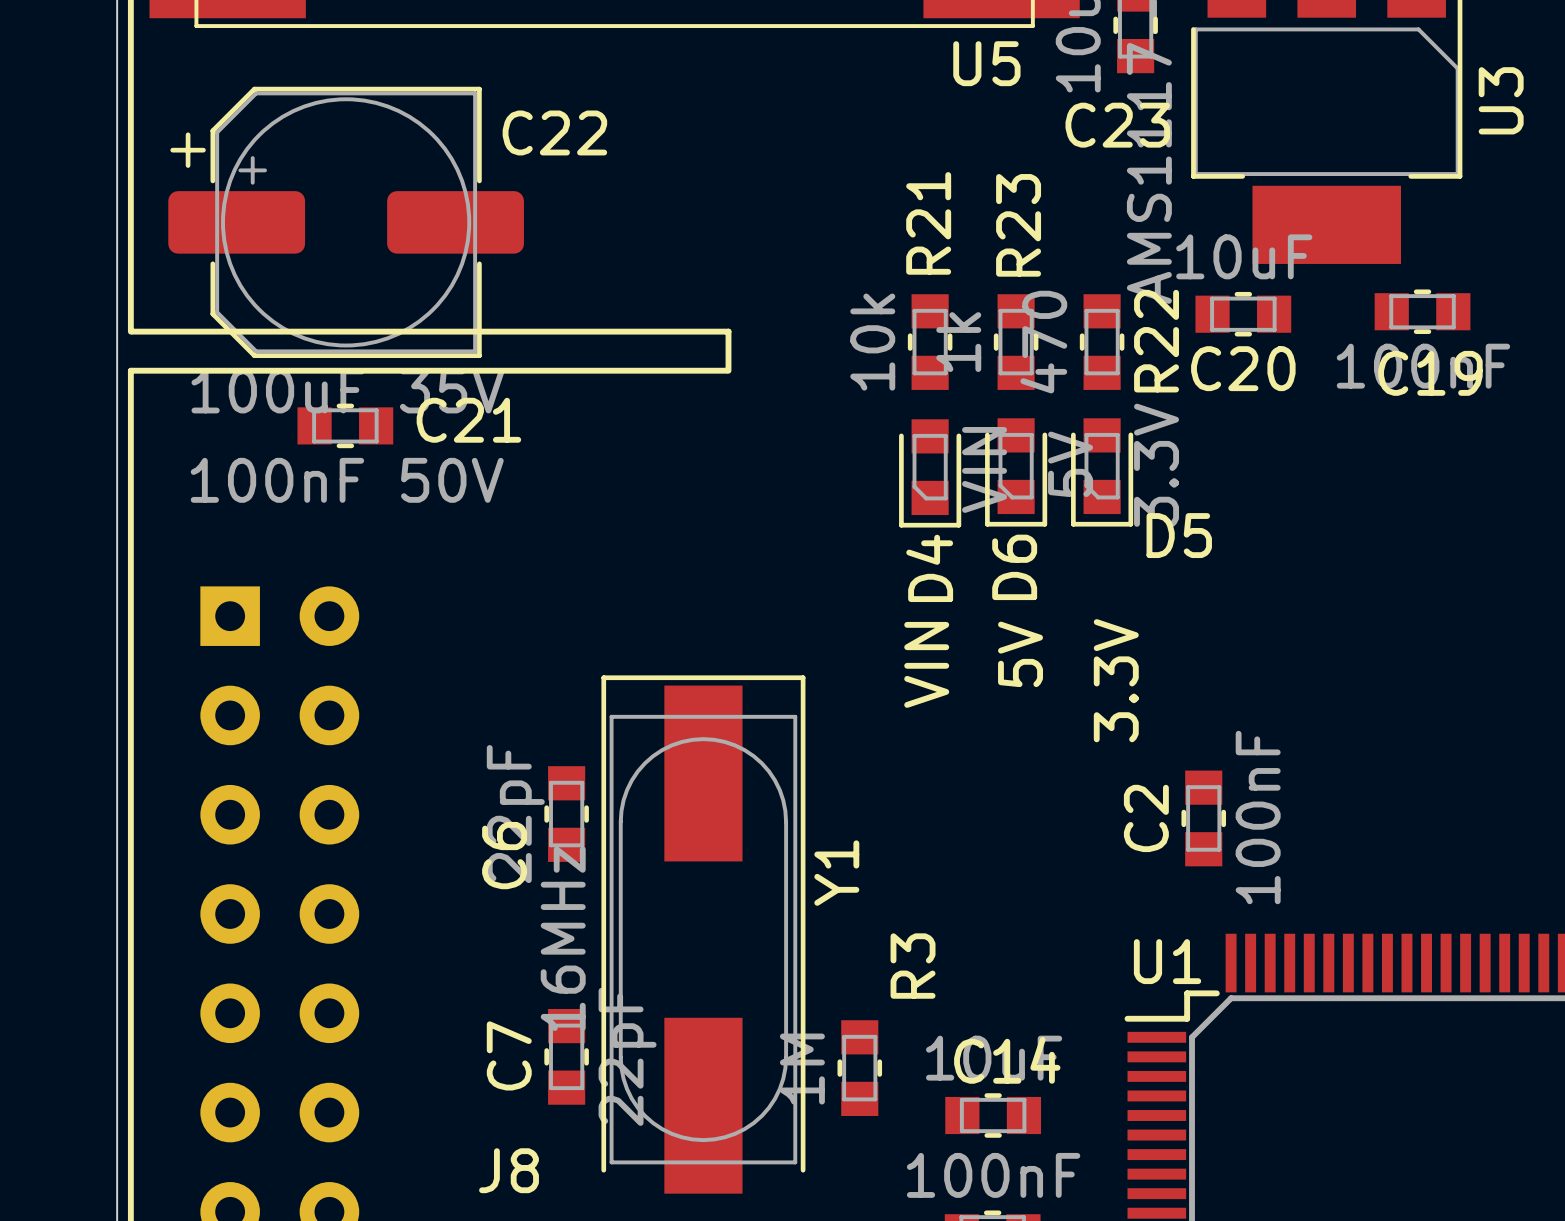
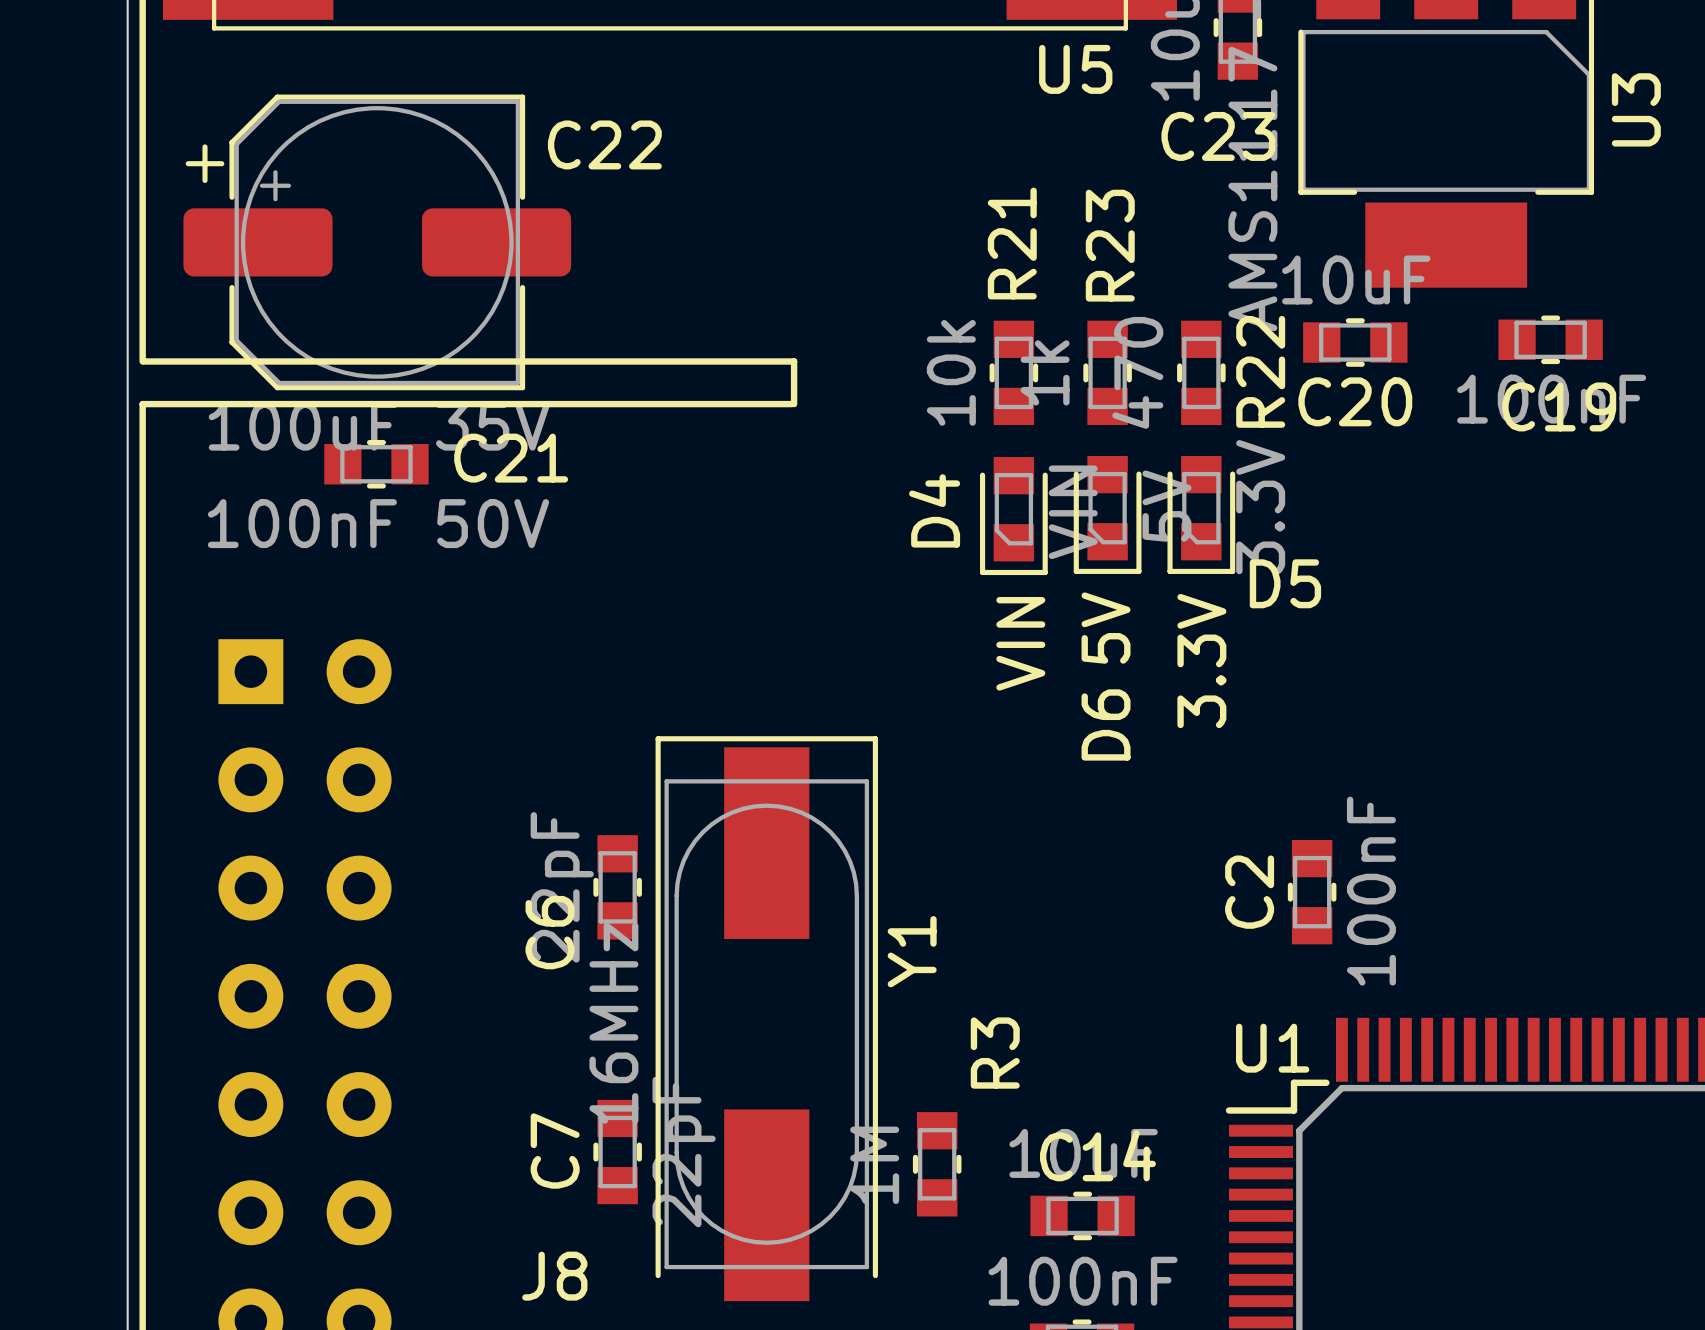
D6 name position: D6 (1014, 567) -> D6 (1106, 724)
D4 name position: D4 (929, 568) -> D4 (934, 510)
text position: 5V (1020, 654) -> 5V (1106, 628)
text position: VIN (926, 664) -> VIN (1020, 643)
text position: 3.3V (1116, 680) -> 3.3V (1201, 661)

